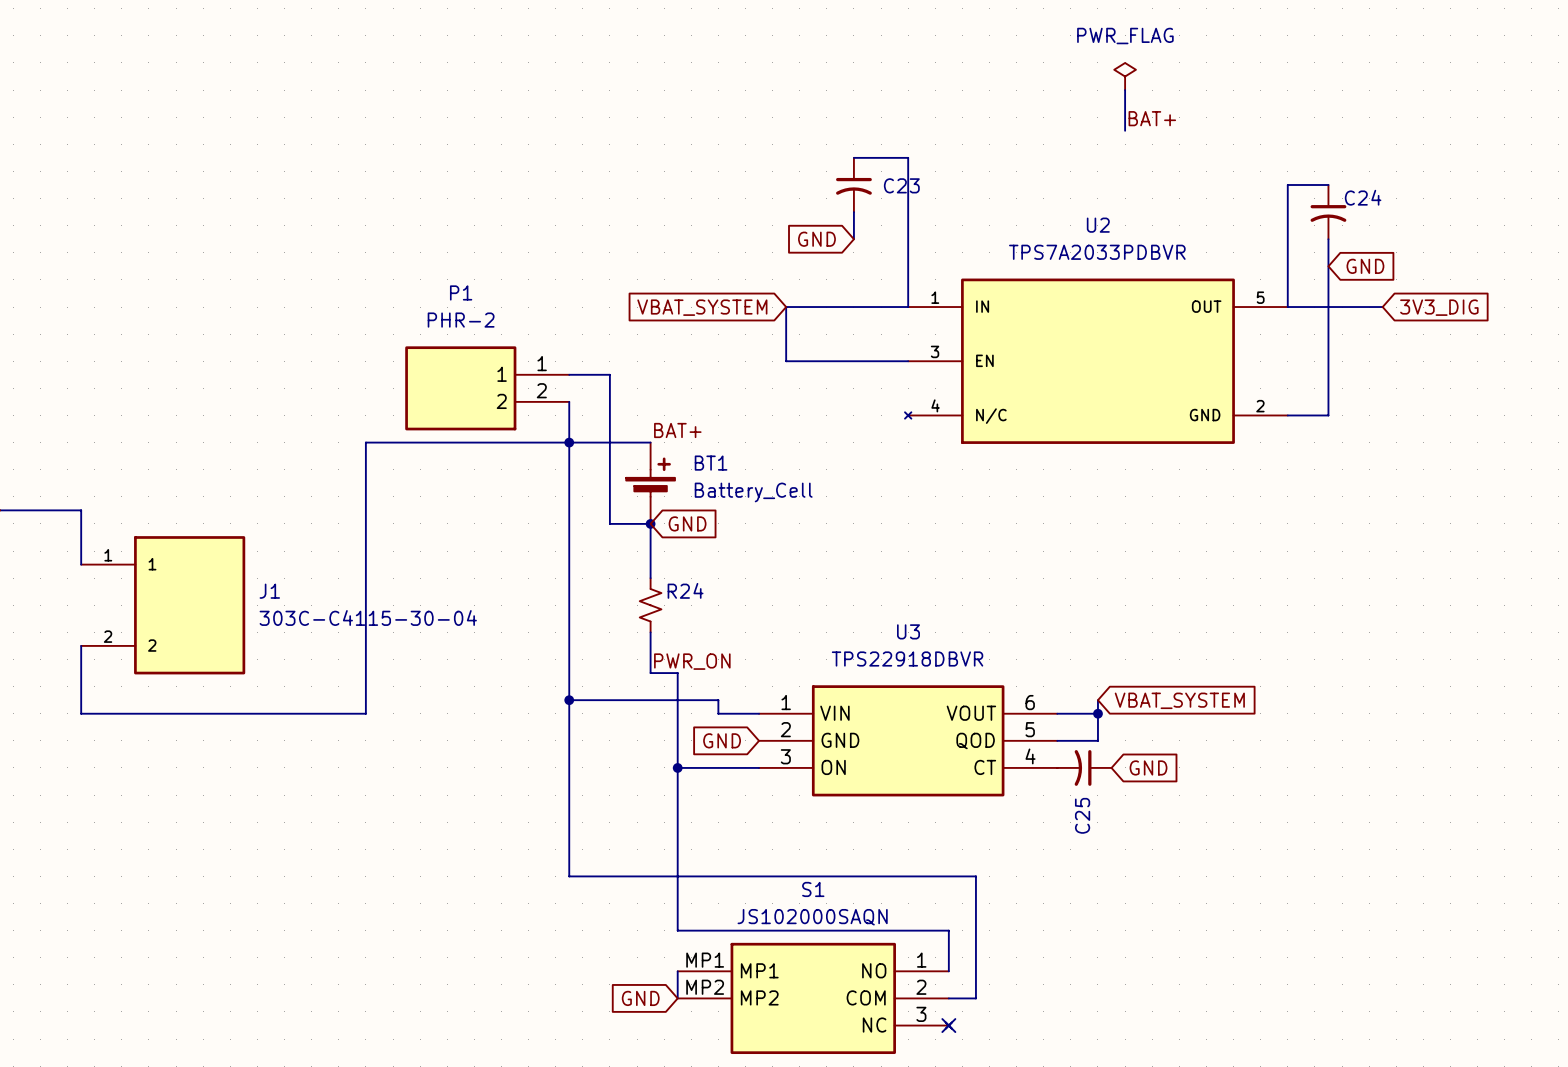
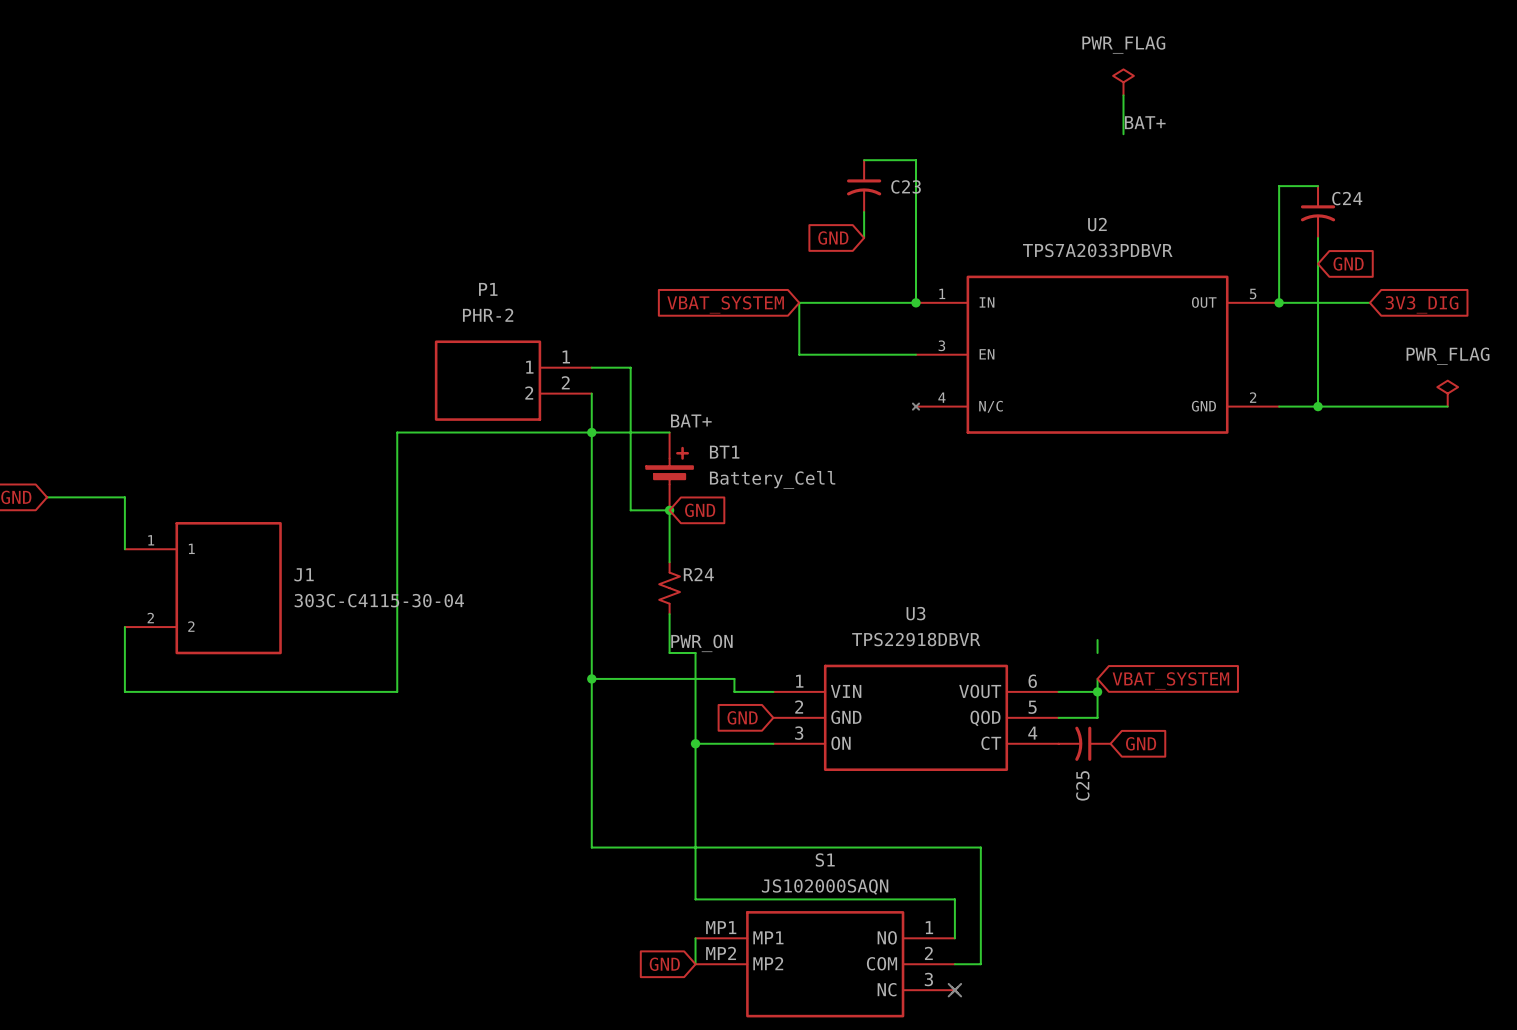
junction: none -> (915, 302)
junction: none -> (1279, 302)
power symbol: none -> PWR_FLAG (1447, 393)
wire: none -> (1318, 406) (1447, 406)
junction: none -> (1318, 406)
wire: none -> (1097, 640) (1097, 652)

